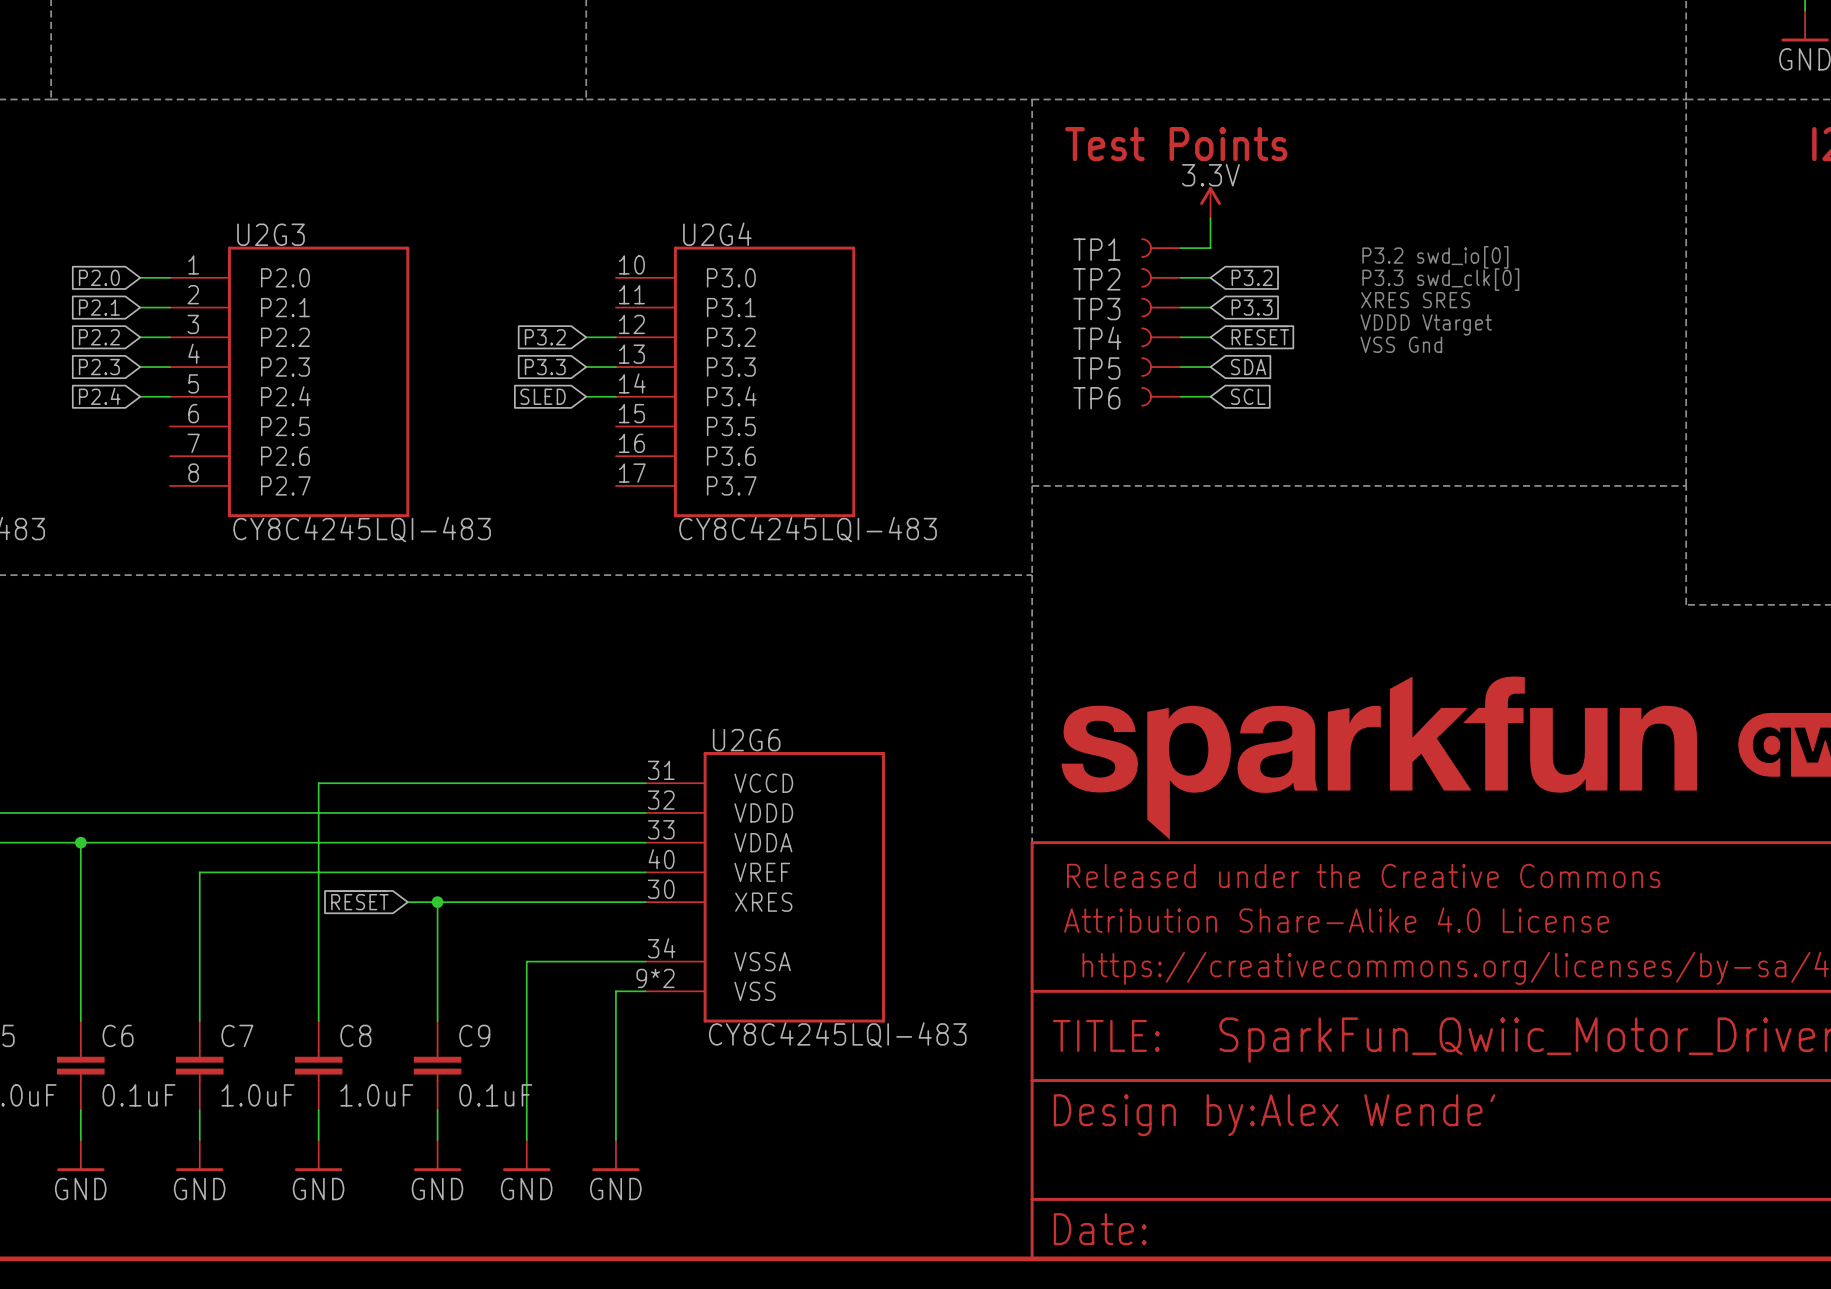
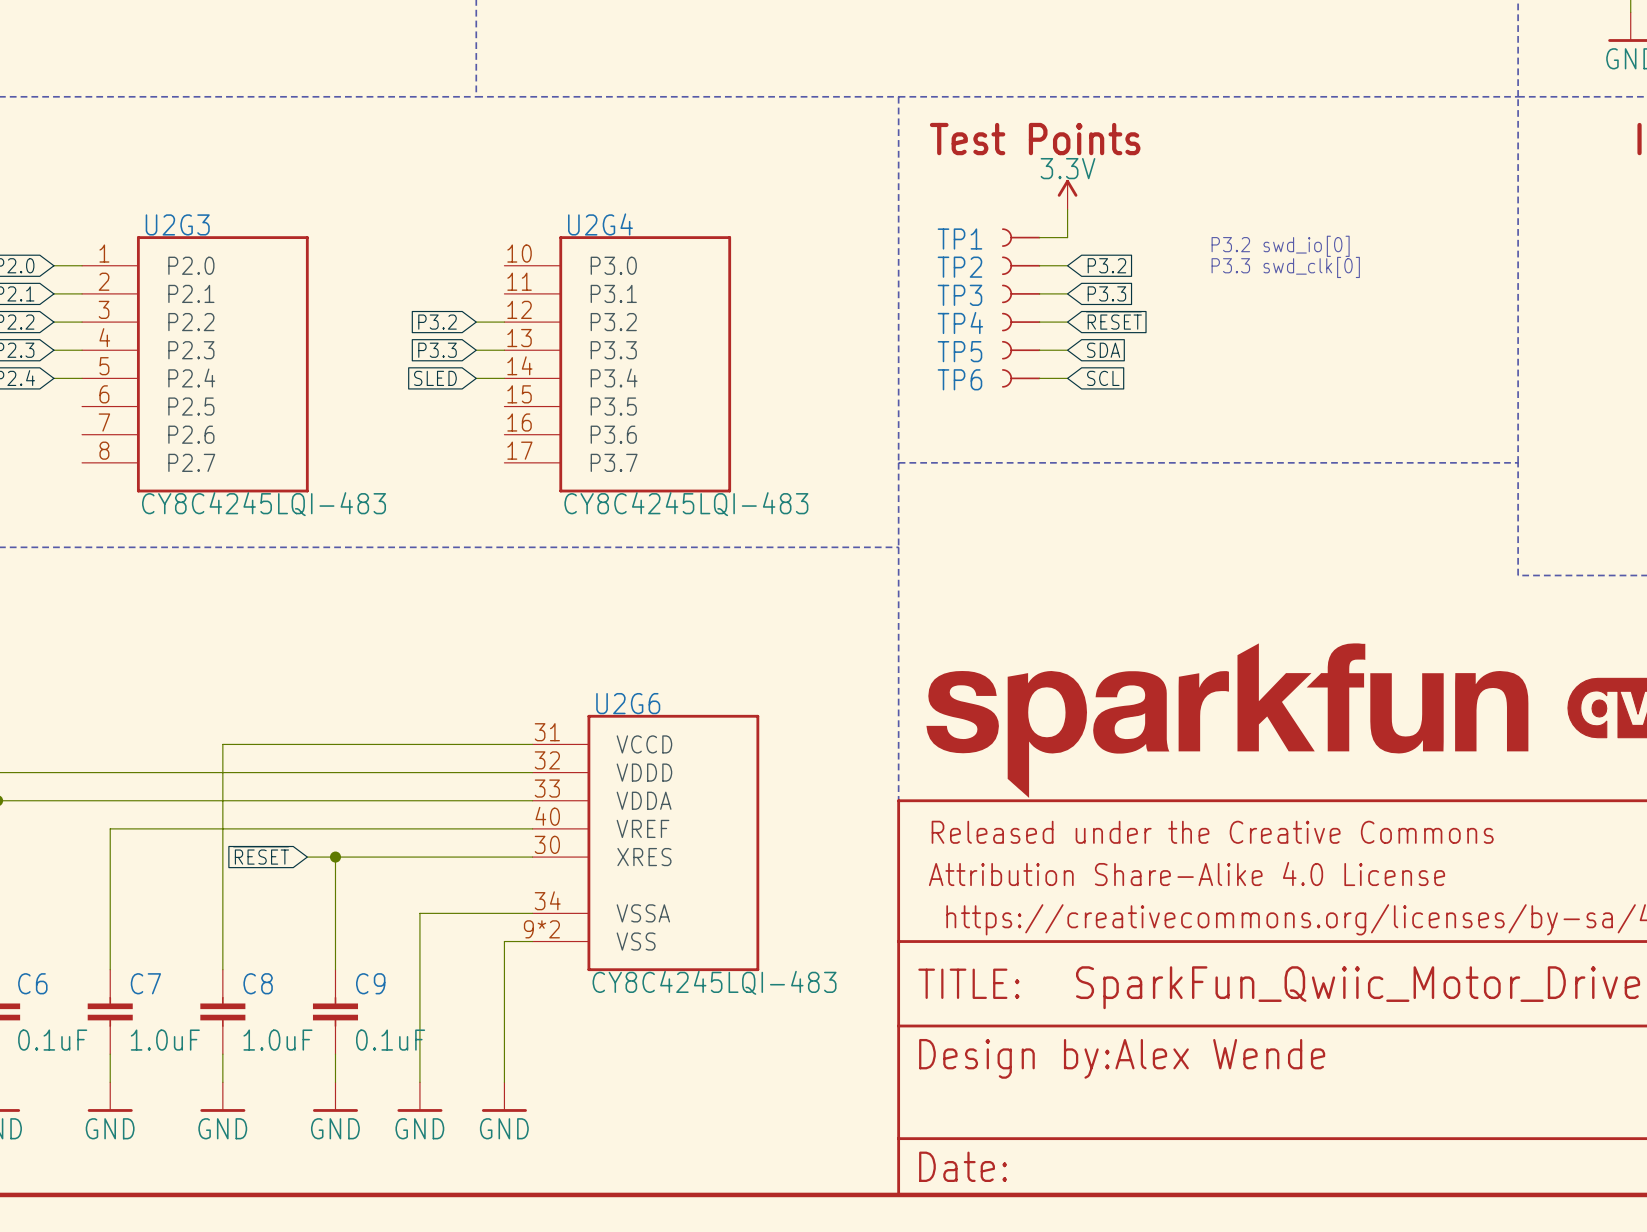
text: XRES SRES (1415, 300) -> none
text: VDDD Vtarget (1426, 324) -> none
text: VSS Gnd (1401, 344) -> none
text: Alex Wende' (1378, 1110) -> Alex Wende (1220, 1054)

